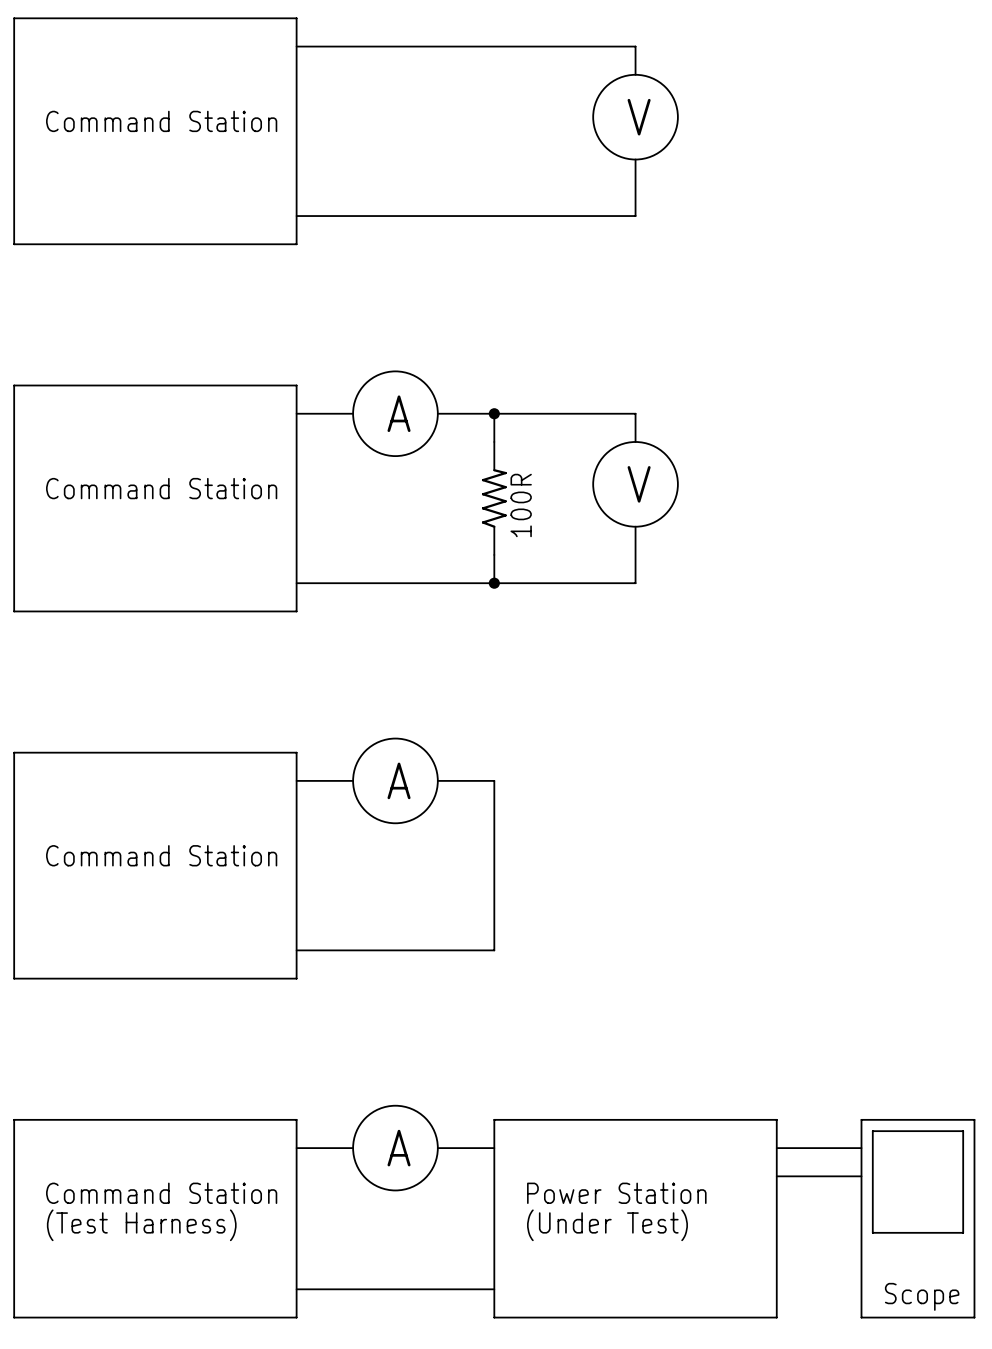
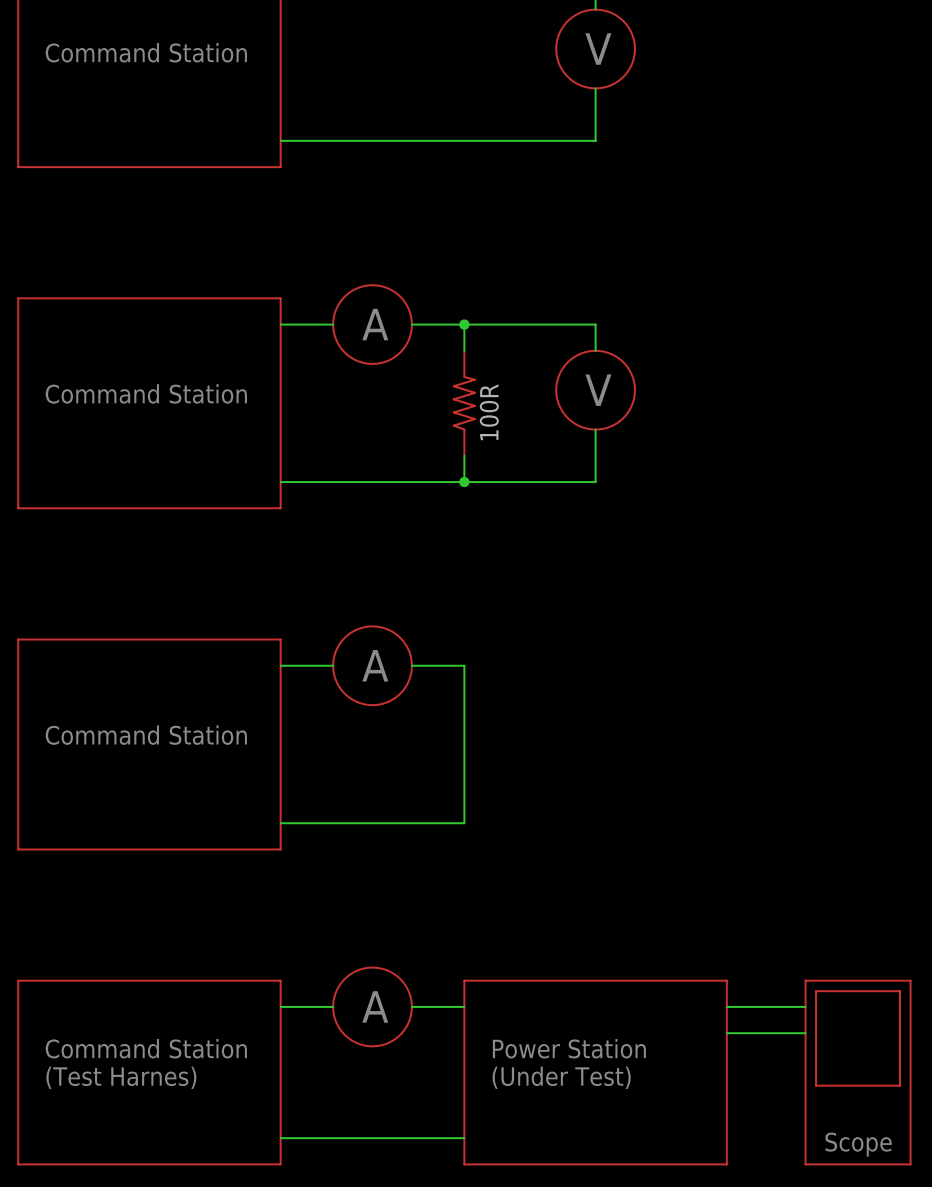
text: (Test Harness) (141, 1225) -> (Test Harnes) (121, 1077)

